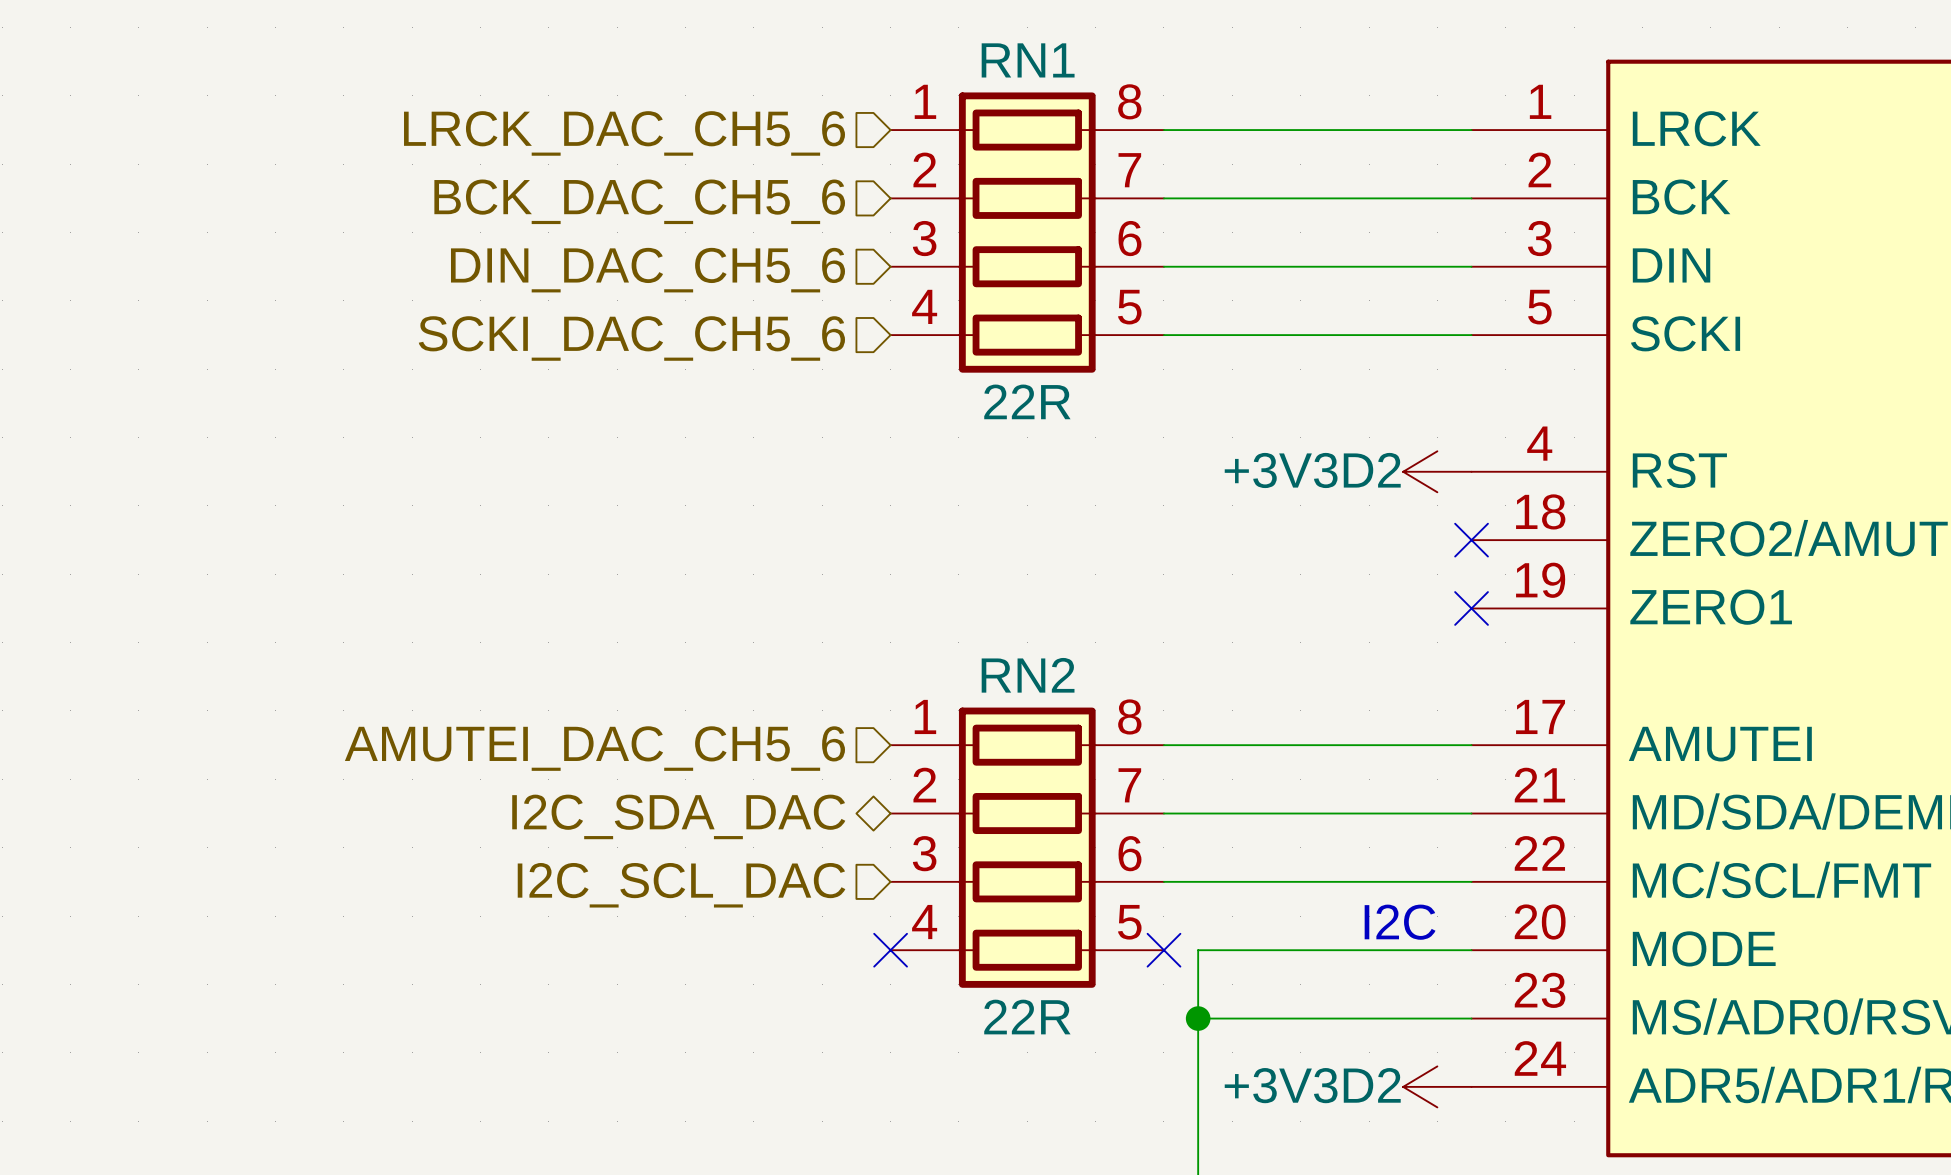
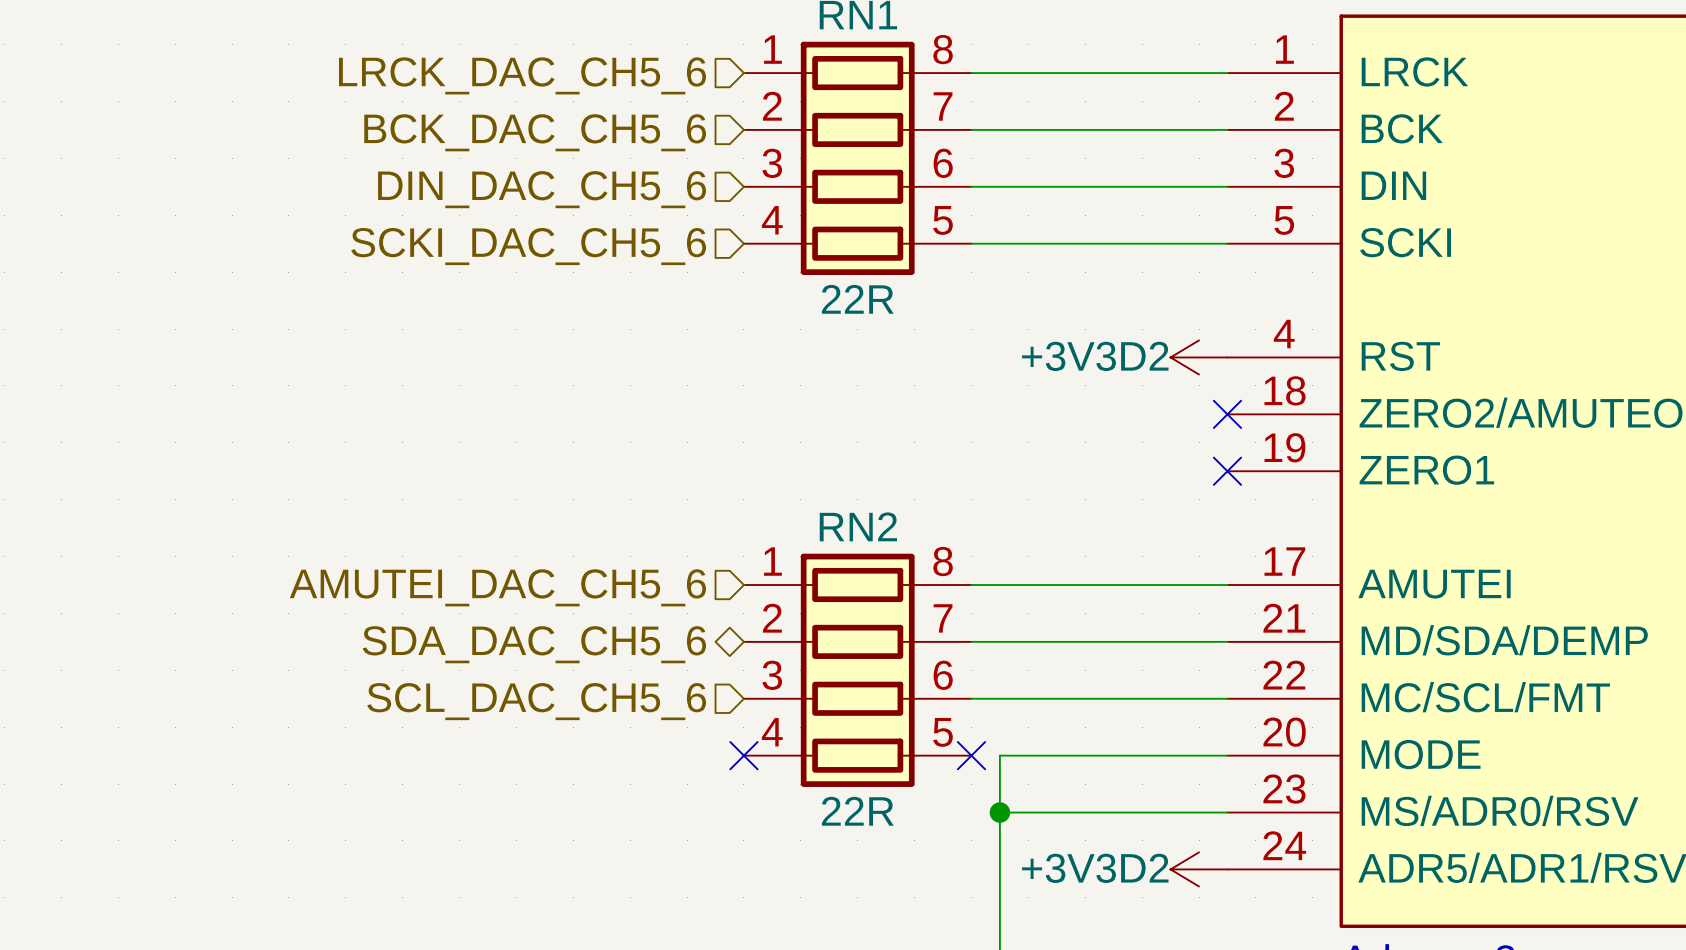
hierarchical label: I2C_SDA_DAC (678, 816) -> SDA_DAC_CH5_6 (534, 644)
hierarchical label: I2C_SCL_DAC (681, 885) -> SCL_DAC_CH5_6 (536, 701)
text: I2C (1400, 922) -> none

